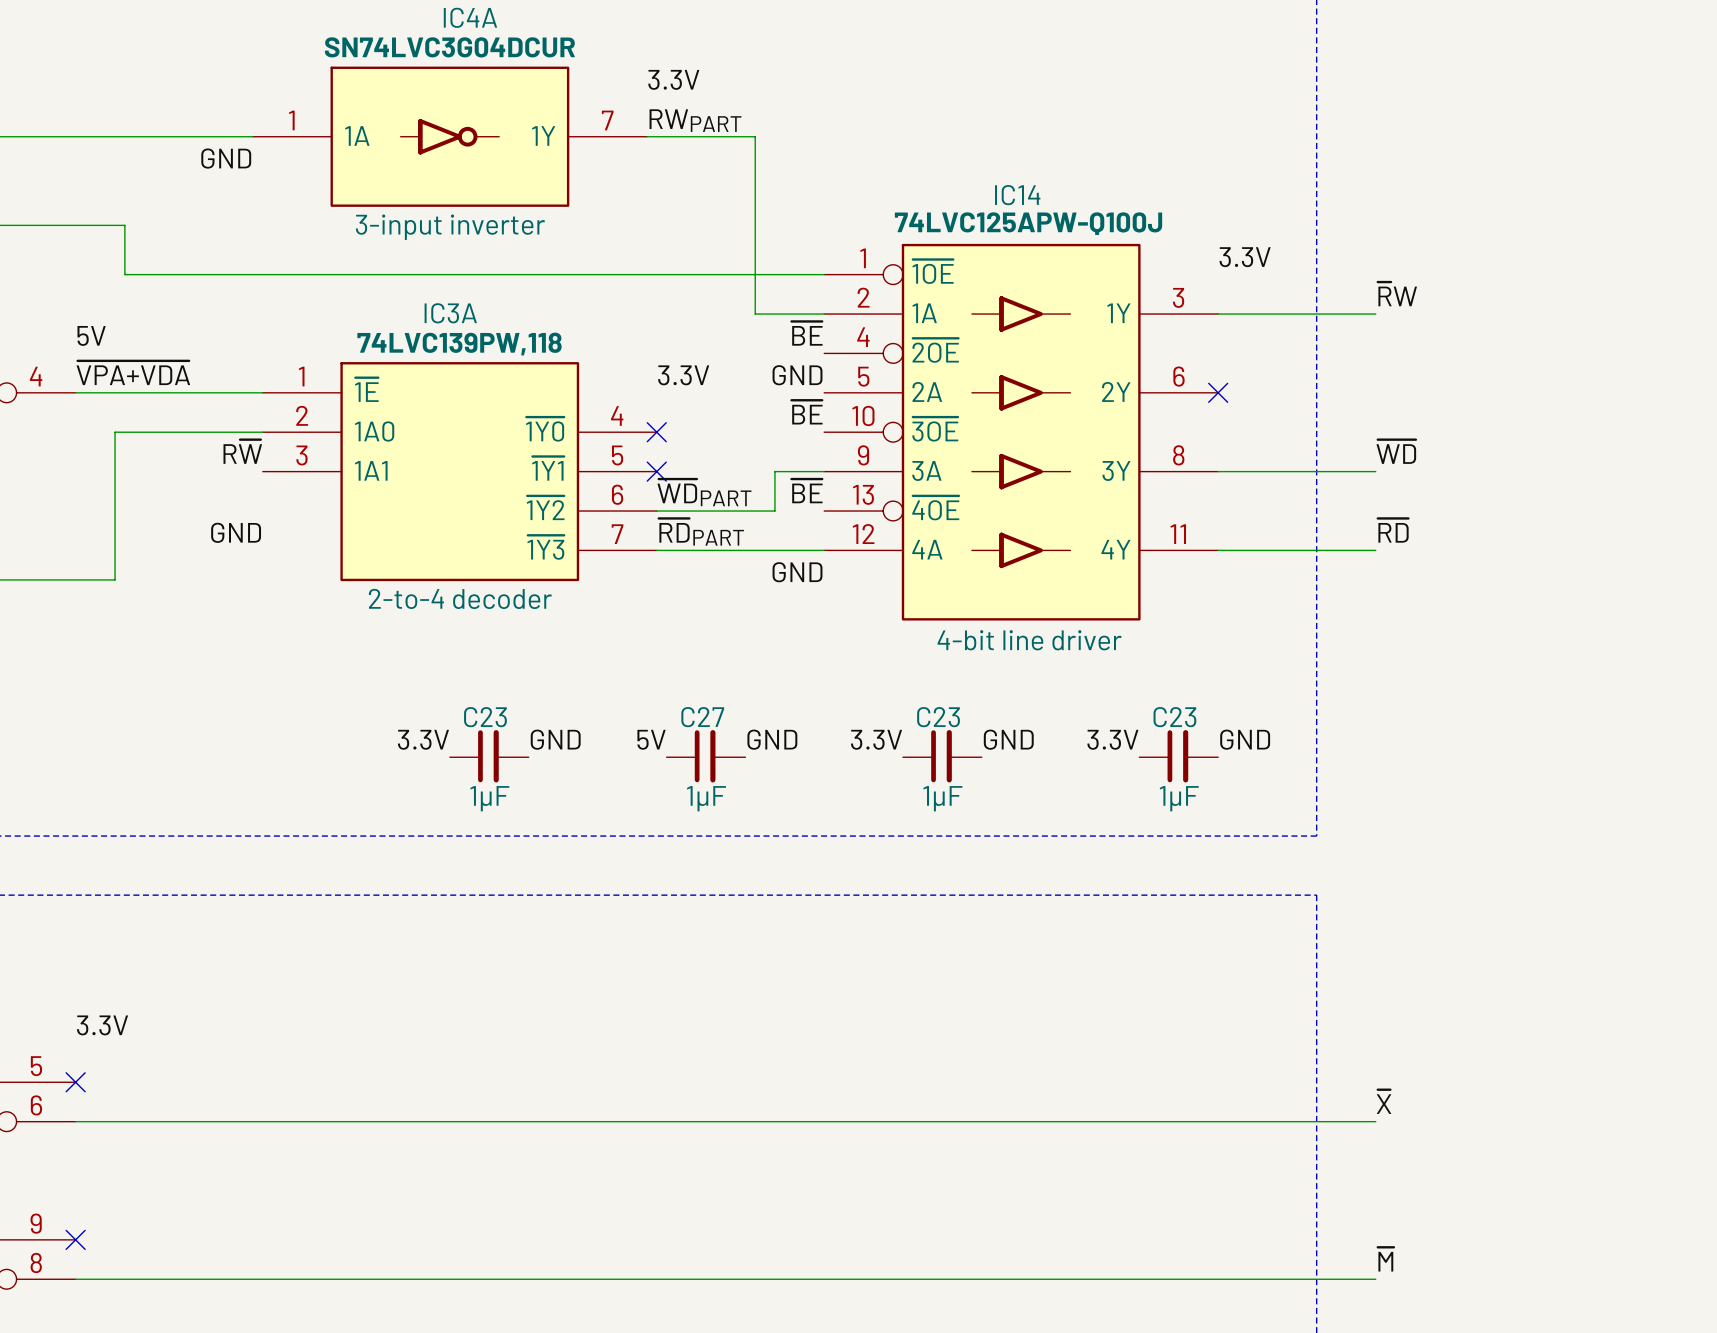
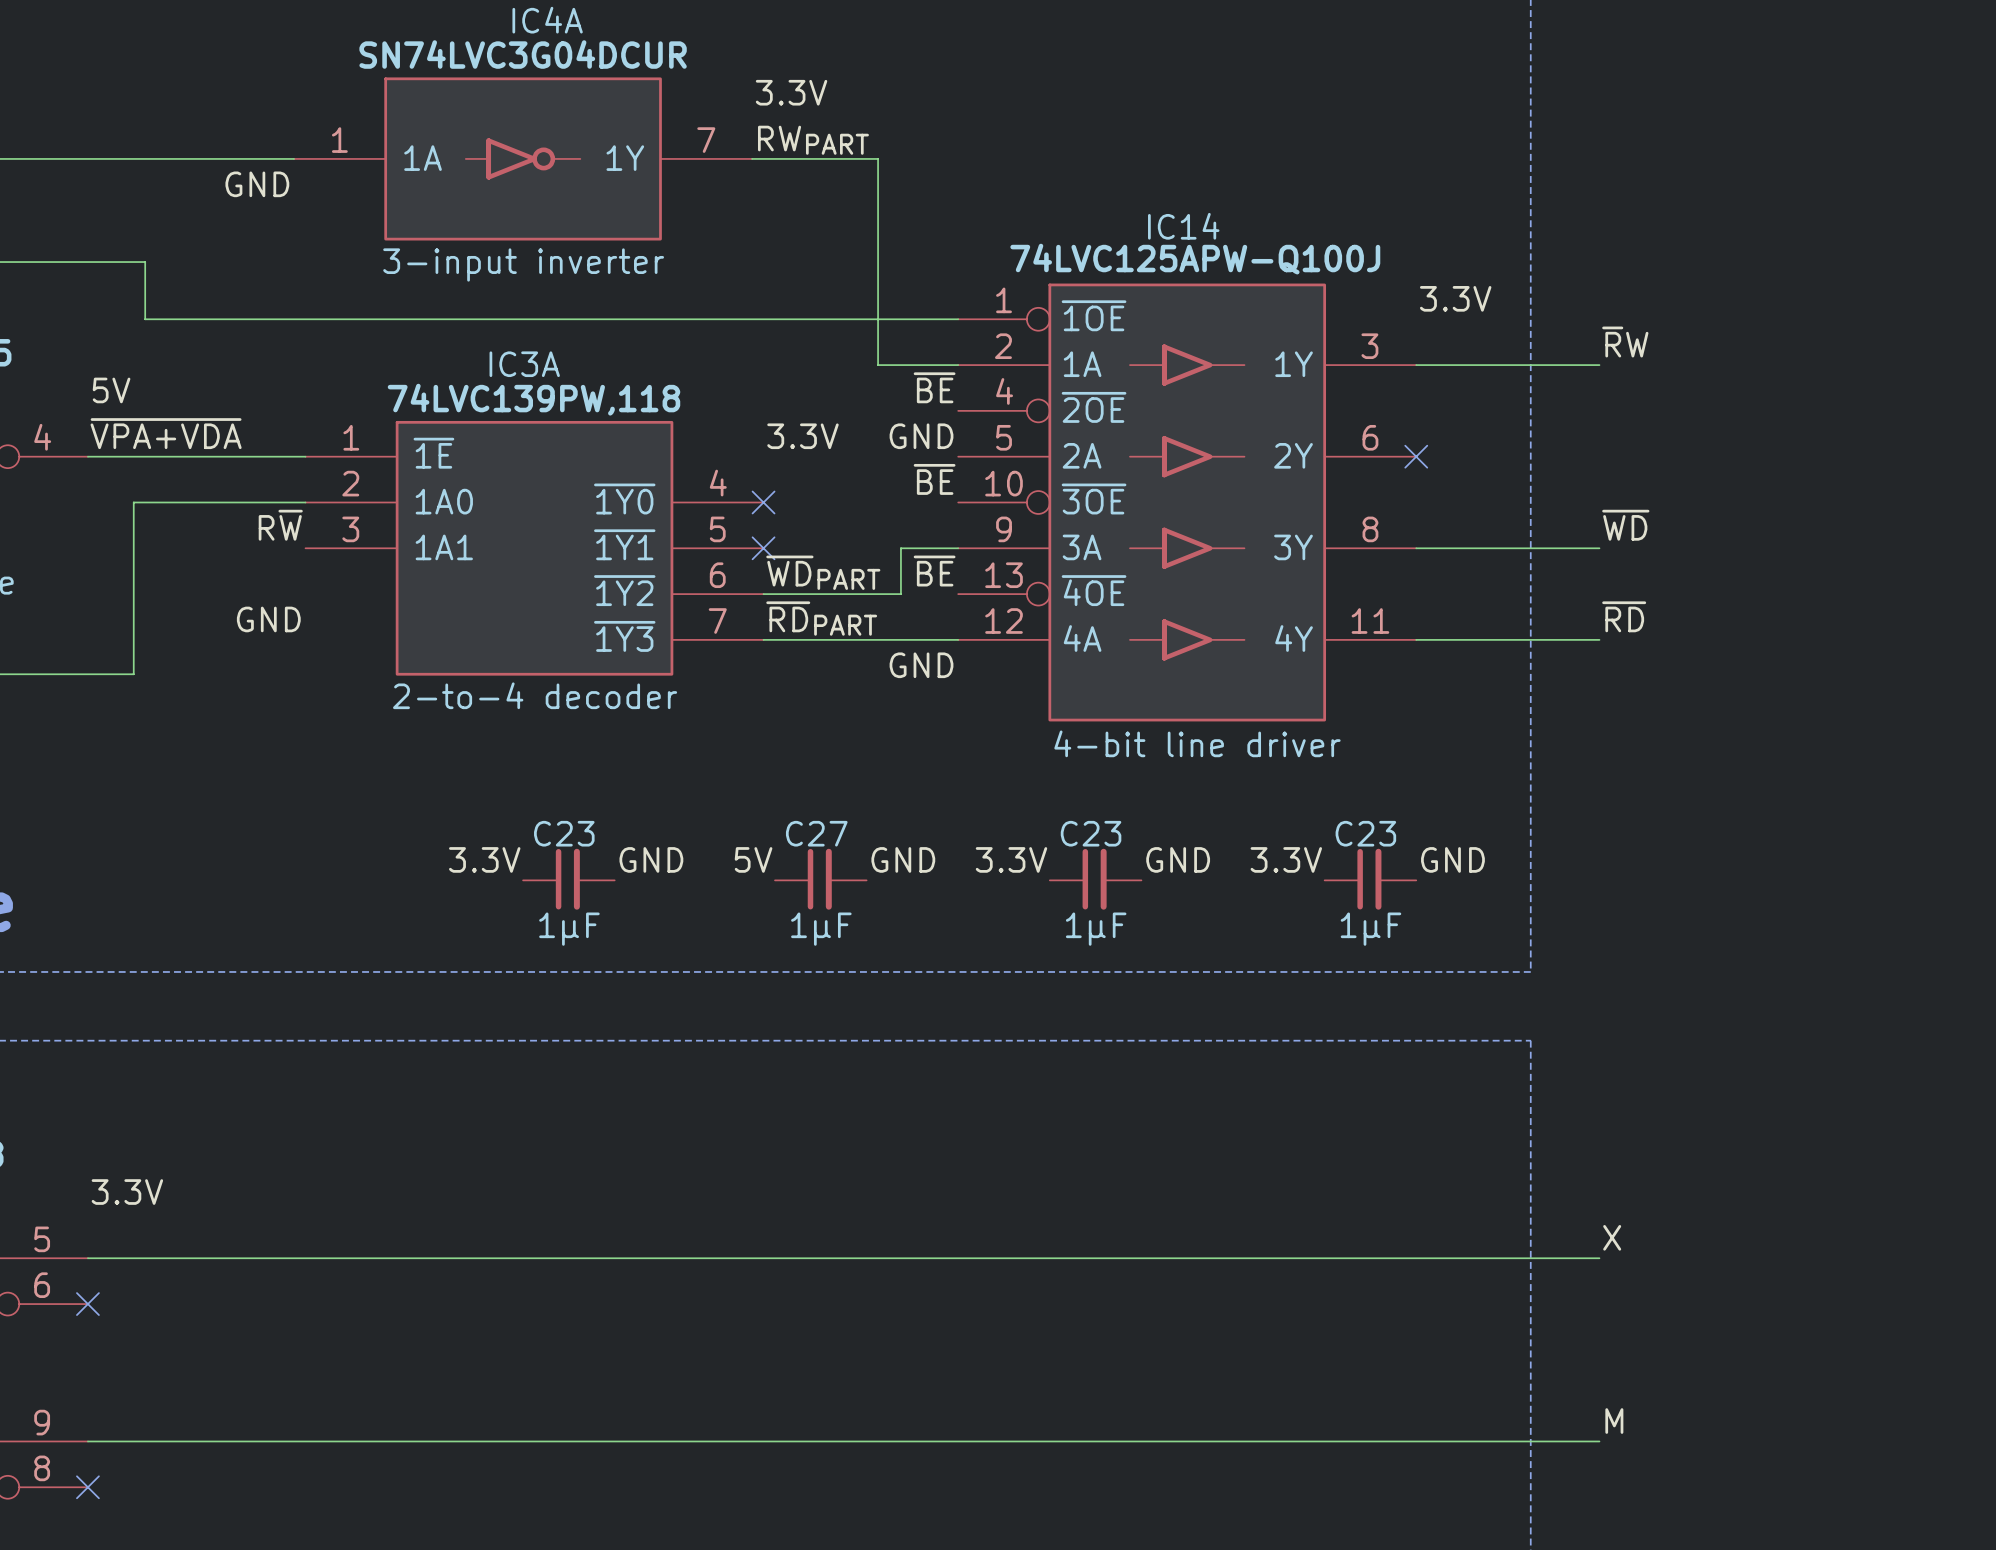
label: none -> X (1612, 1237)
no-connect mark position: (75, 1082) -> (87, 1304)
label: ~{X} (1384, 1101) -> none
wire: (75, 1121) (1375, 1121) -> (87, 1258) (1599, 1258)
label: none -> M (1614, 1421)
no-connect mark position: (75, 1239) -> (87, 1487)
label: ~{M} (1385, 1259) -> none
wire: (75, 1279) (1375, 1279) -> (87, 1441) (1599, 1441)

